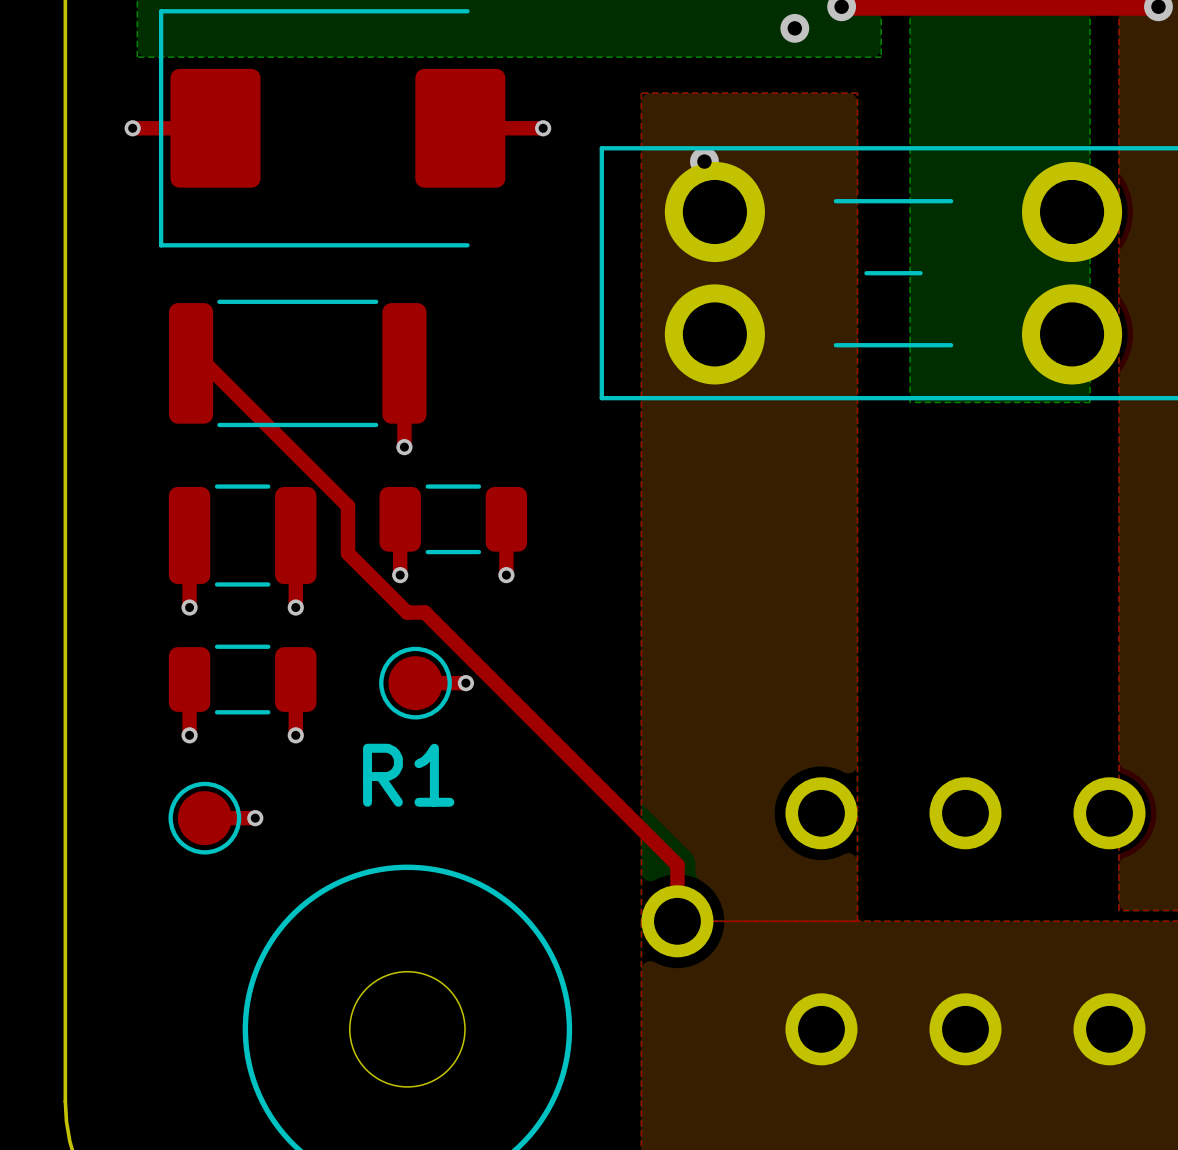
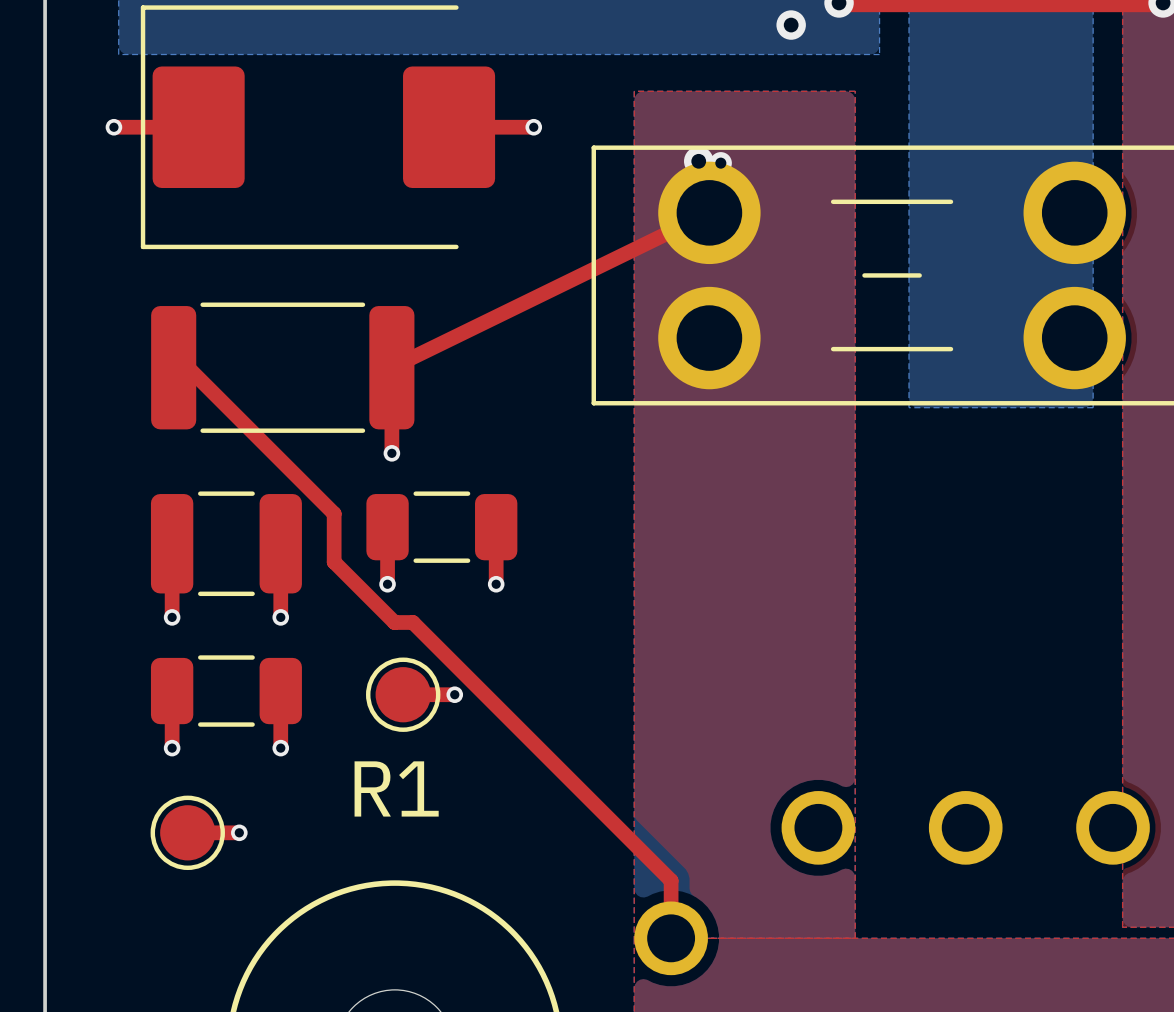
via: none -> (720, 163)
top track: none -> (709, 212) (391, 367)

